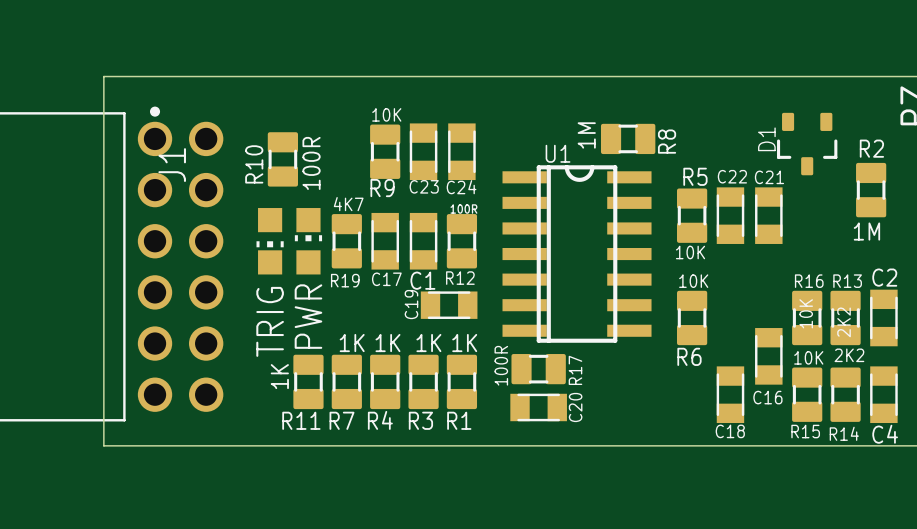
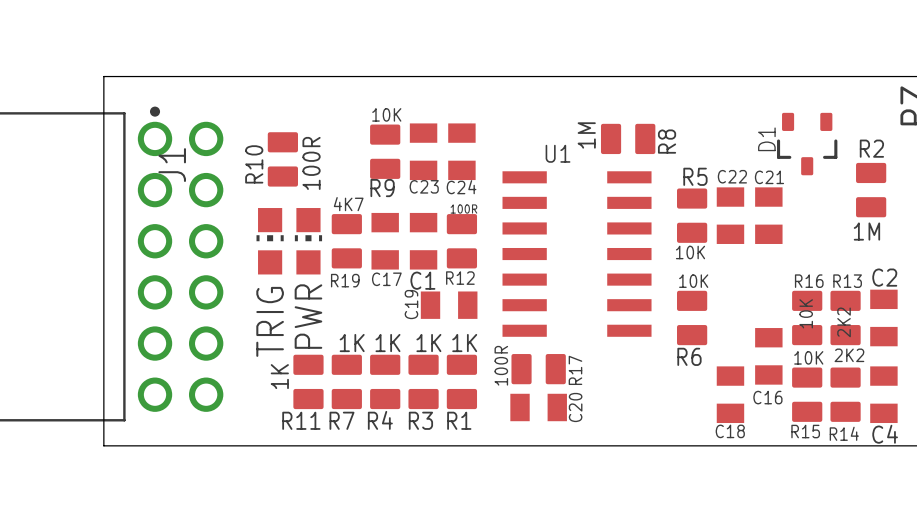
C23 footprint: [409, 123, 438, 181] -> [409, 123, 438, 181]
C24 footprint: [448, 123, 476, 181] -> [448, 123, 476, 181]
R8 footprint: [600, 123, 656, 155] -> [600, 123, 656, 155]
R9 footprint: [370, 124, 401, 179] -> [370, 124, 401, 179]
R10 footprint: [267, 132, 298, 187] -> [267, 132, 298, 187]
R2 footprint: [856, 162, 887, 218] -> [856, 162, 887, 218]
U1 footprint: [502, 165, 652, 343] -> [502, 171, 652, 337]
C22 footprint: [716, 187, 745, 244] -> [716, 187, 745, 244]
C21 footprint: [755, 187, 783, 244] -> [755, 187, 783, 244]
R5 footprint: [677, 188, 708, 243] -> [677, 188, 708, 243]
C17 footprint: [371, 212, 399, 270] -> [371, 212, 399, 270]
C1 footprint: [409, 212, 438, 270] -> [409, 212, 438, 270]
R19 footprint: [331, 214, 362, 269] -> [331, 214, 362, 269]
R12 footprint: [446, 214, 478, 269] -> [446, 214, 478, 269]
TRIG rotation: 0° (270, 241) -> 180° (270, 241)
C2 footprint: [870, 289, 898, 347] -> [870, 289, 898, 347]
R6 footprint: [677, 290, 708, 346] -> [677, 290, 708, 346]
R16 footprint: [792, 290, 823, 346] -> [792, 290, 823, 346]
R13 footprint: [830, 290, 861, 346] -> [830, 290, 861, 346]
C19 footprint: [420, 291, 478, 319] -> [420, 291, 478, 319]
C16 footprint: [755, 328, 783, 385] -> [755, 328, 783, 385]
R11 footprint: [293, 354, 324, 410] -> [293, 354, 324, 410]
R7 footprint: [331, 354, 362, 410] -> [331, 354, 362, 410]
R4 footprint: [370, 354, 401, 410] -> [370, 354, 401, 410]
R3 footprint: [408, 354, 439, 410] -> [408, 354, 439, 410]
R1 footprint: [446, 354, 478, 410] -> [446, 354, 478, 410]
R17 footprint: [511, 354, 566, 385] -> [511, 354, 566, 385]
C18 footprint: [716, 366, 745, 424] -> [716, 366, 745, 424]
C4 footprint: [870, 366, 898, 424] -> [870, 366, 898, 424]
R15 footprint: [792, 367, 823, 422] -> [792, 367, 823, 422]
R14 footprint: [830, 367, 861, 422] -> [830, 367, 861, 422]
C20 footprint: [510, 393, 567, 422] -> [510, 393, 567, 422]

